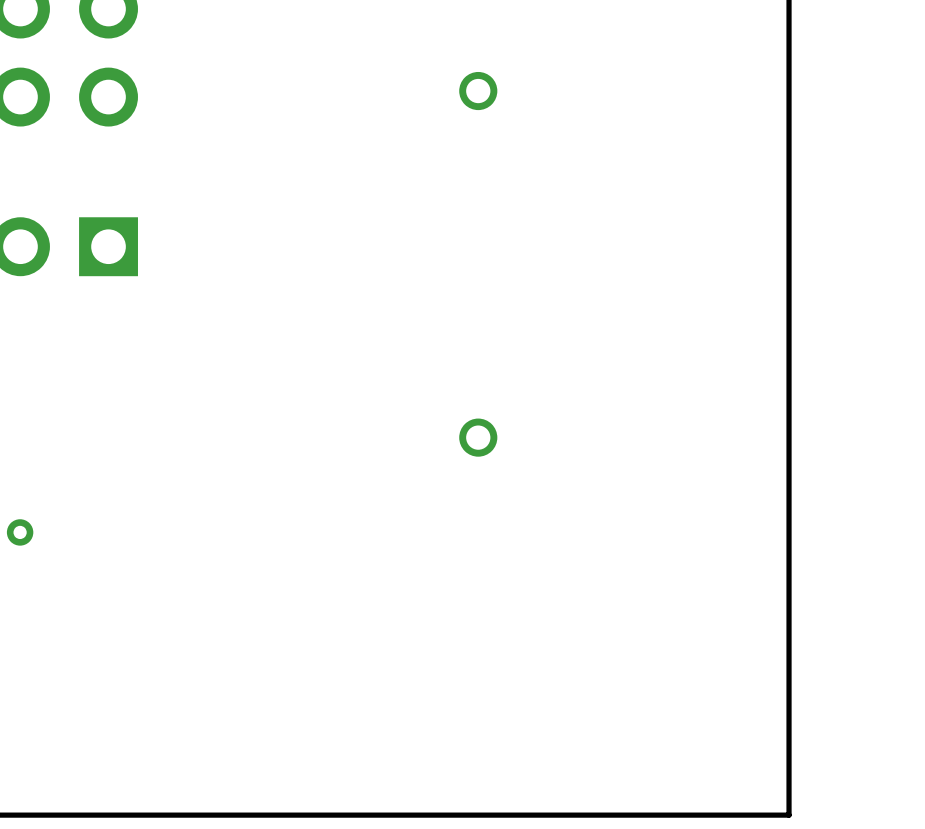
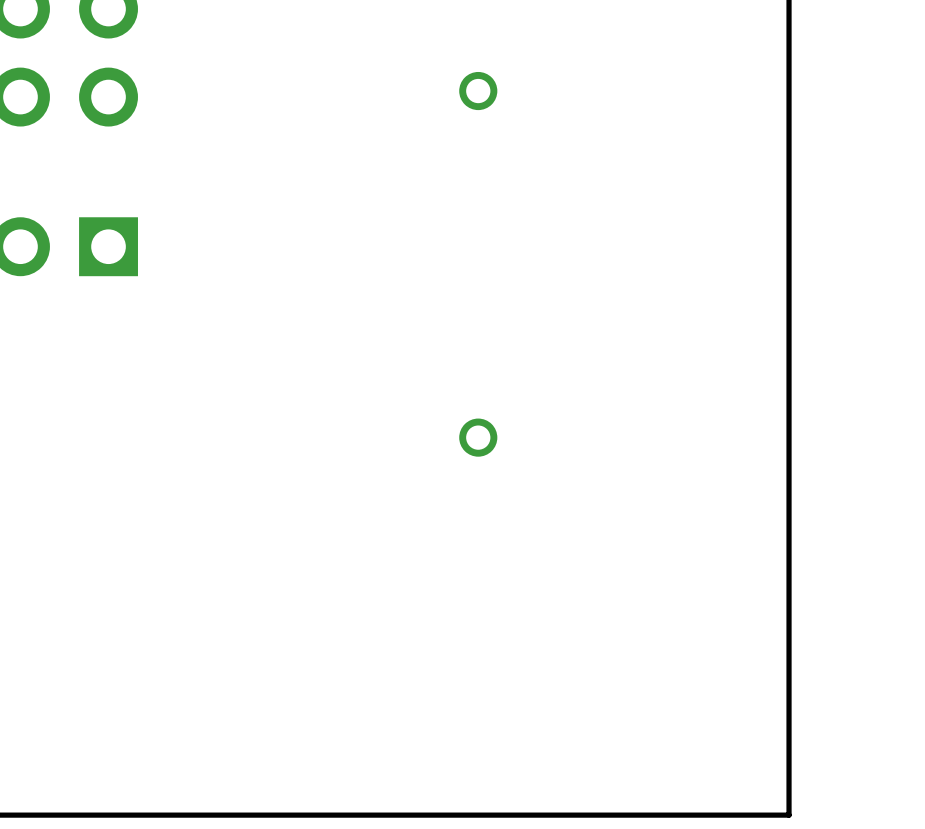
via: (20, 532) -> none

